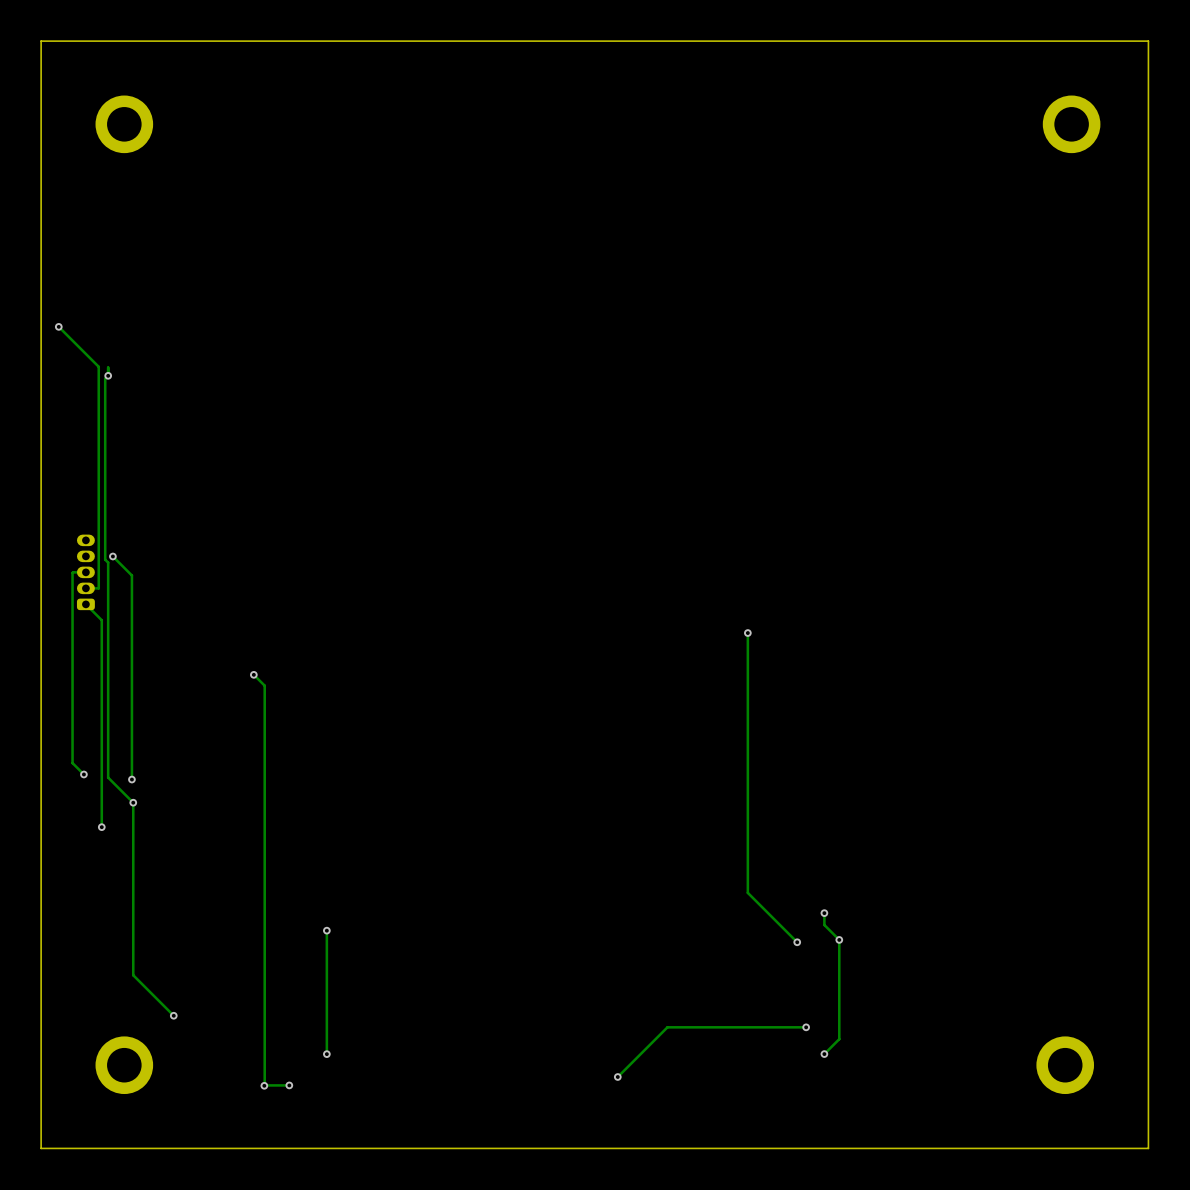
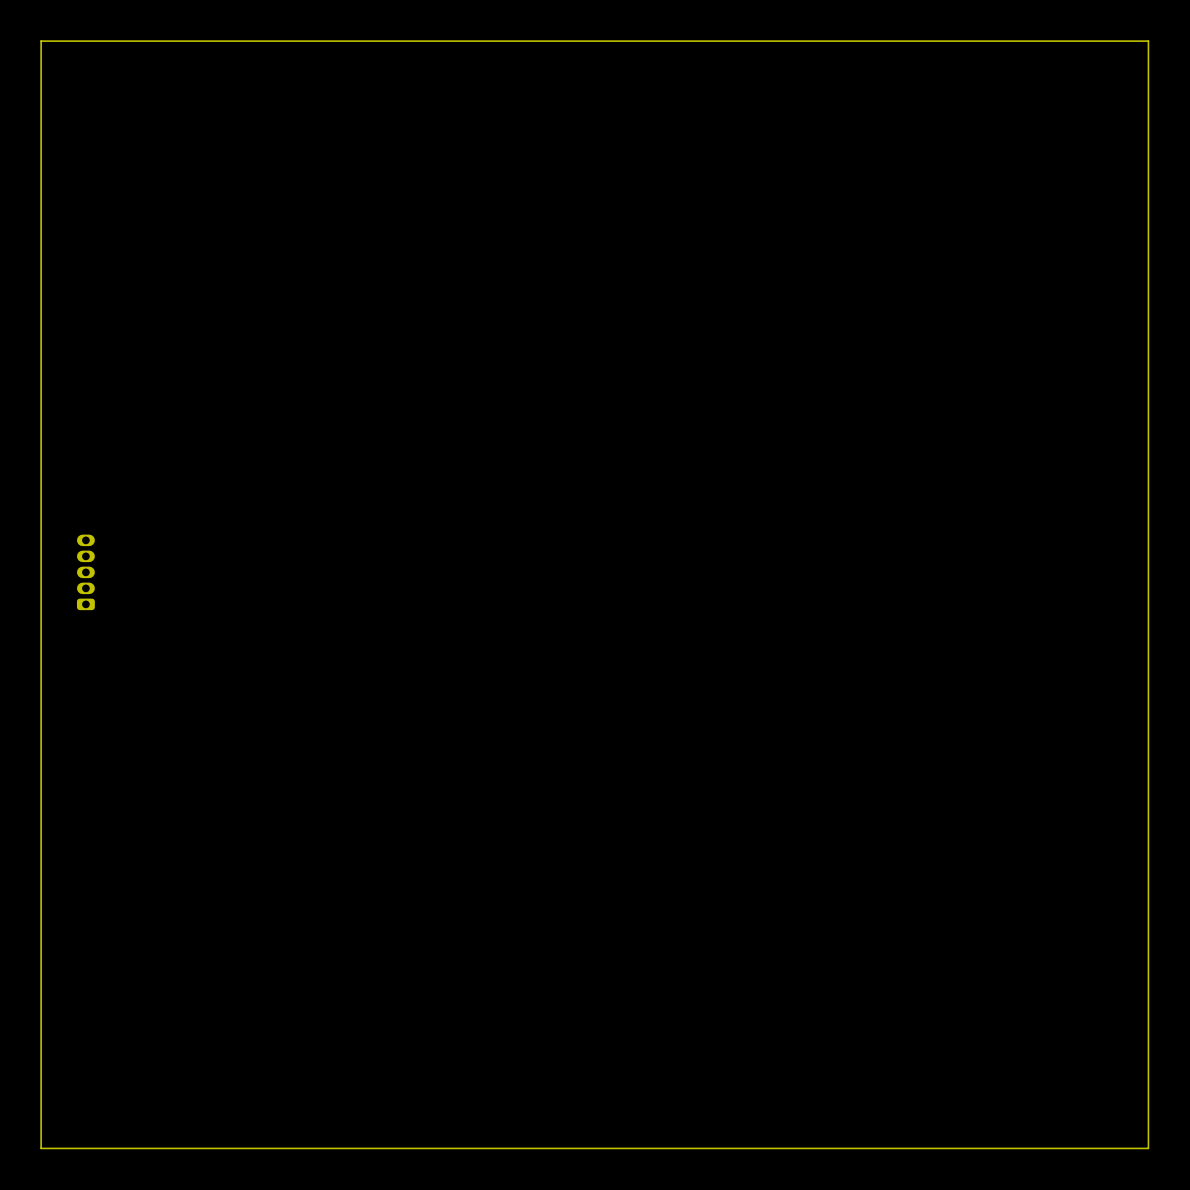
part: (124, 124) -> none
part: (1071, 124) -> none
track: (58, 326) (98, 366) (98, 588) (85, 588) -> none
via: (58, 326) -> none
track: (108, 367) (108, 375) (105, 378) (105, 559) (108, 562) (108, 777) (133, 802) (133, 975) (173, 1015) -> none
via: (108, 375) -> none
track: (112, 556) (131, 575) (131, 779) -> none
via: (112, 556) -> none
track: (85, 572) (72, 572) (72, 763) (83, 774) -> none
track: (85, 604) (101, 620) (101, 827) -> none
track: (747, 633) (747, 892) (797, 942) -> none
via: (747, 633) -> none
track: (253, 674) (264, 685) (264, 1085) -> none
via: (253, 674) -> none
via: (83, 774) -> none
via: (131, 779) -> none
via: (133, 802) -> none
via: (101, 827) -> none
track: (824, 913) (824, 925) (839, 939) (839, 1039) (824, 1054) -> none
via: (824, 913) -> none
track: (326, 930) (326, 1054) -> none
via: (326, 930) -> none
via: (839, 939) -> none
via: (797, 942) -> none
via: (173, 1015) -> none
track: (806, 1027) (667, 1027) (617, 1076) -> none
via: (806, 1027) -> none
via: (326, 1054) -> none
via: (824, 1054) -> none
part: (124, 1065) -> none
part: (1065, 1065) -> none
via: (617, 1076) -> none
via: (264, 1085) -> none
track: (289, 1085) (264, 1085) -> none
via: (289, 1085) -> none

